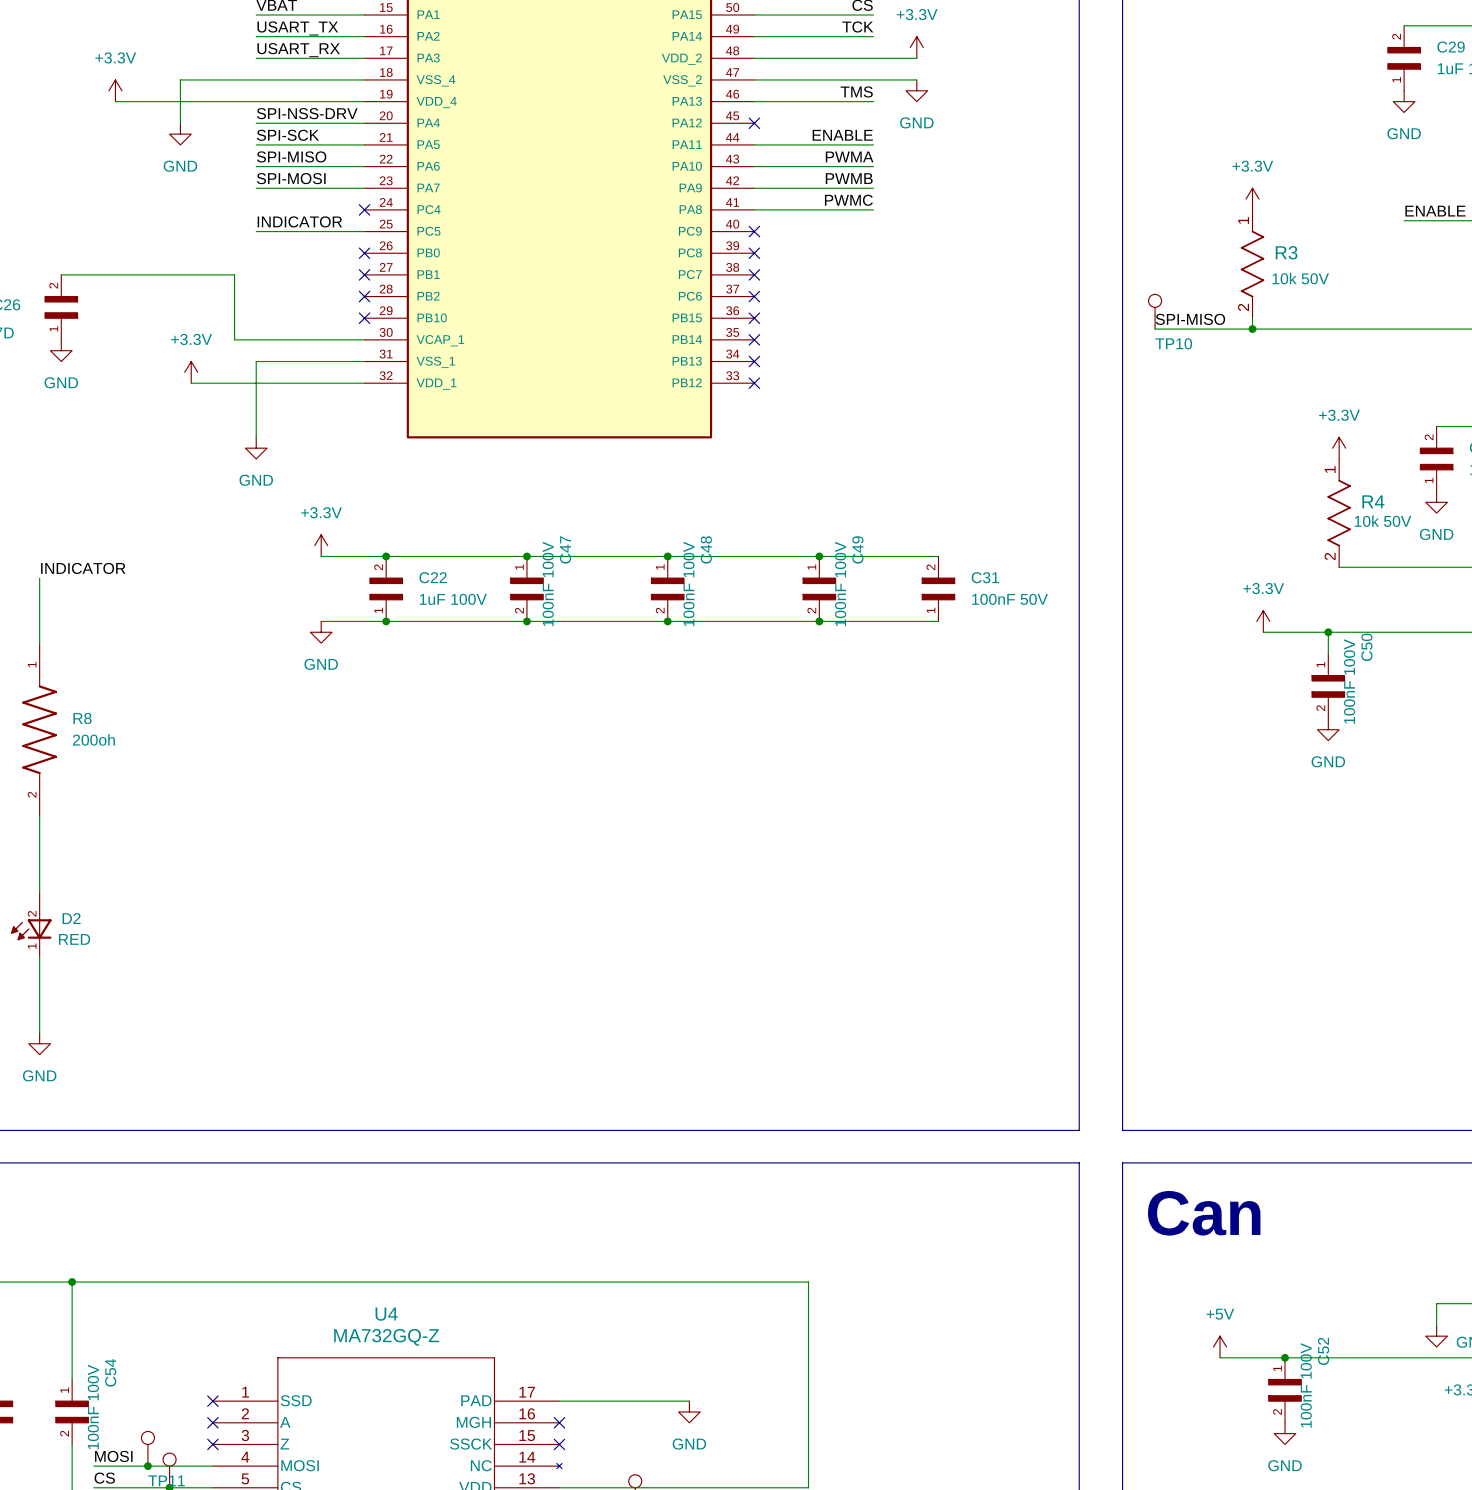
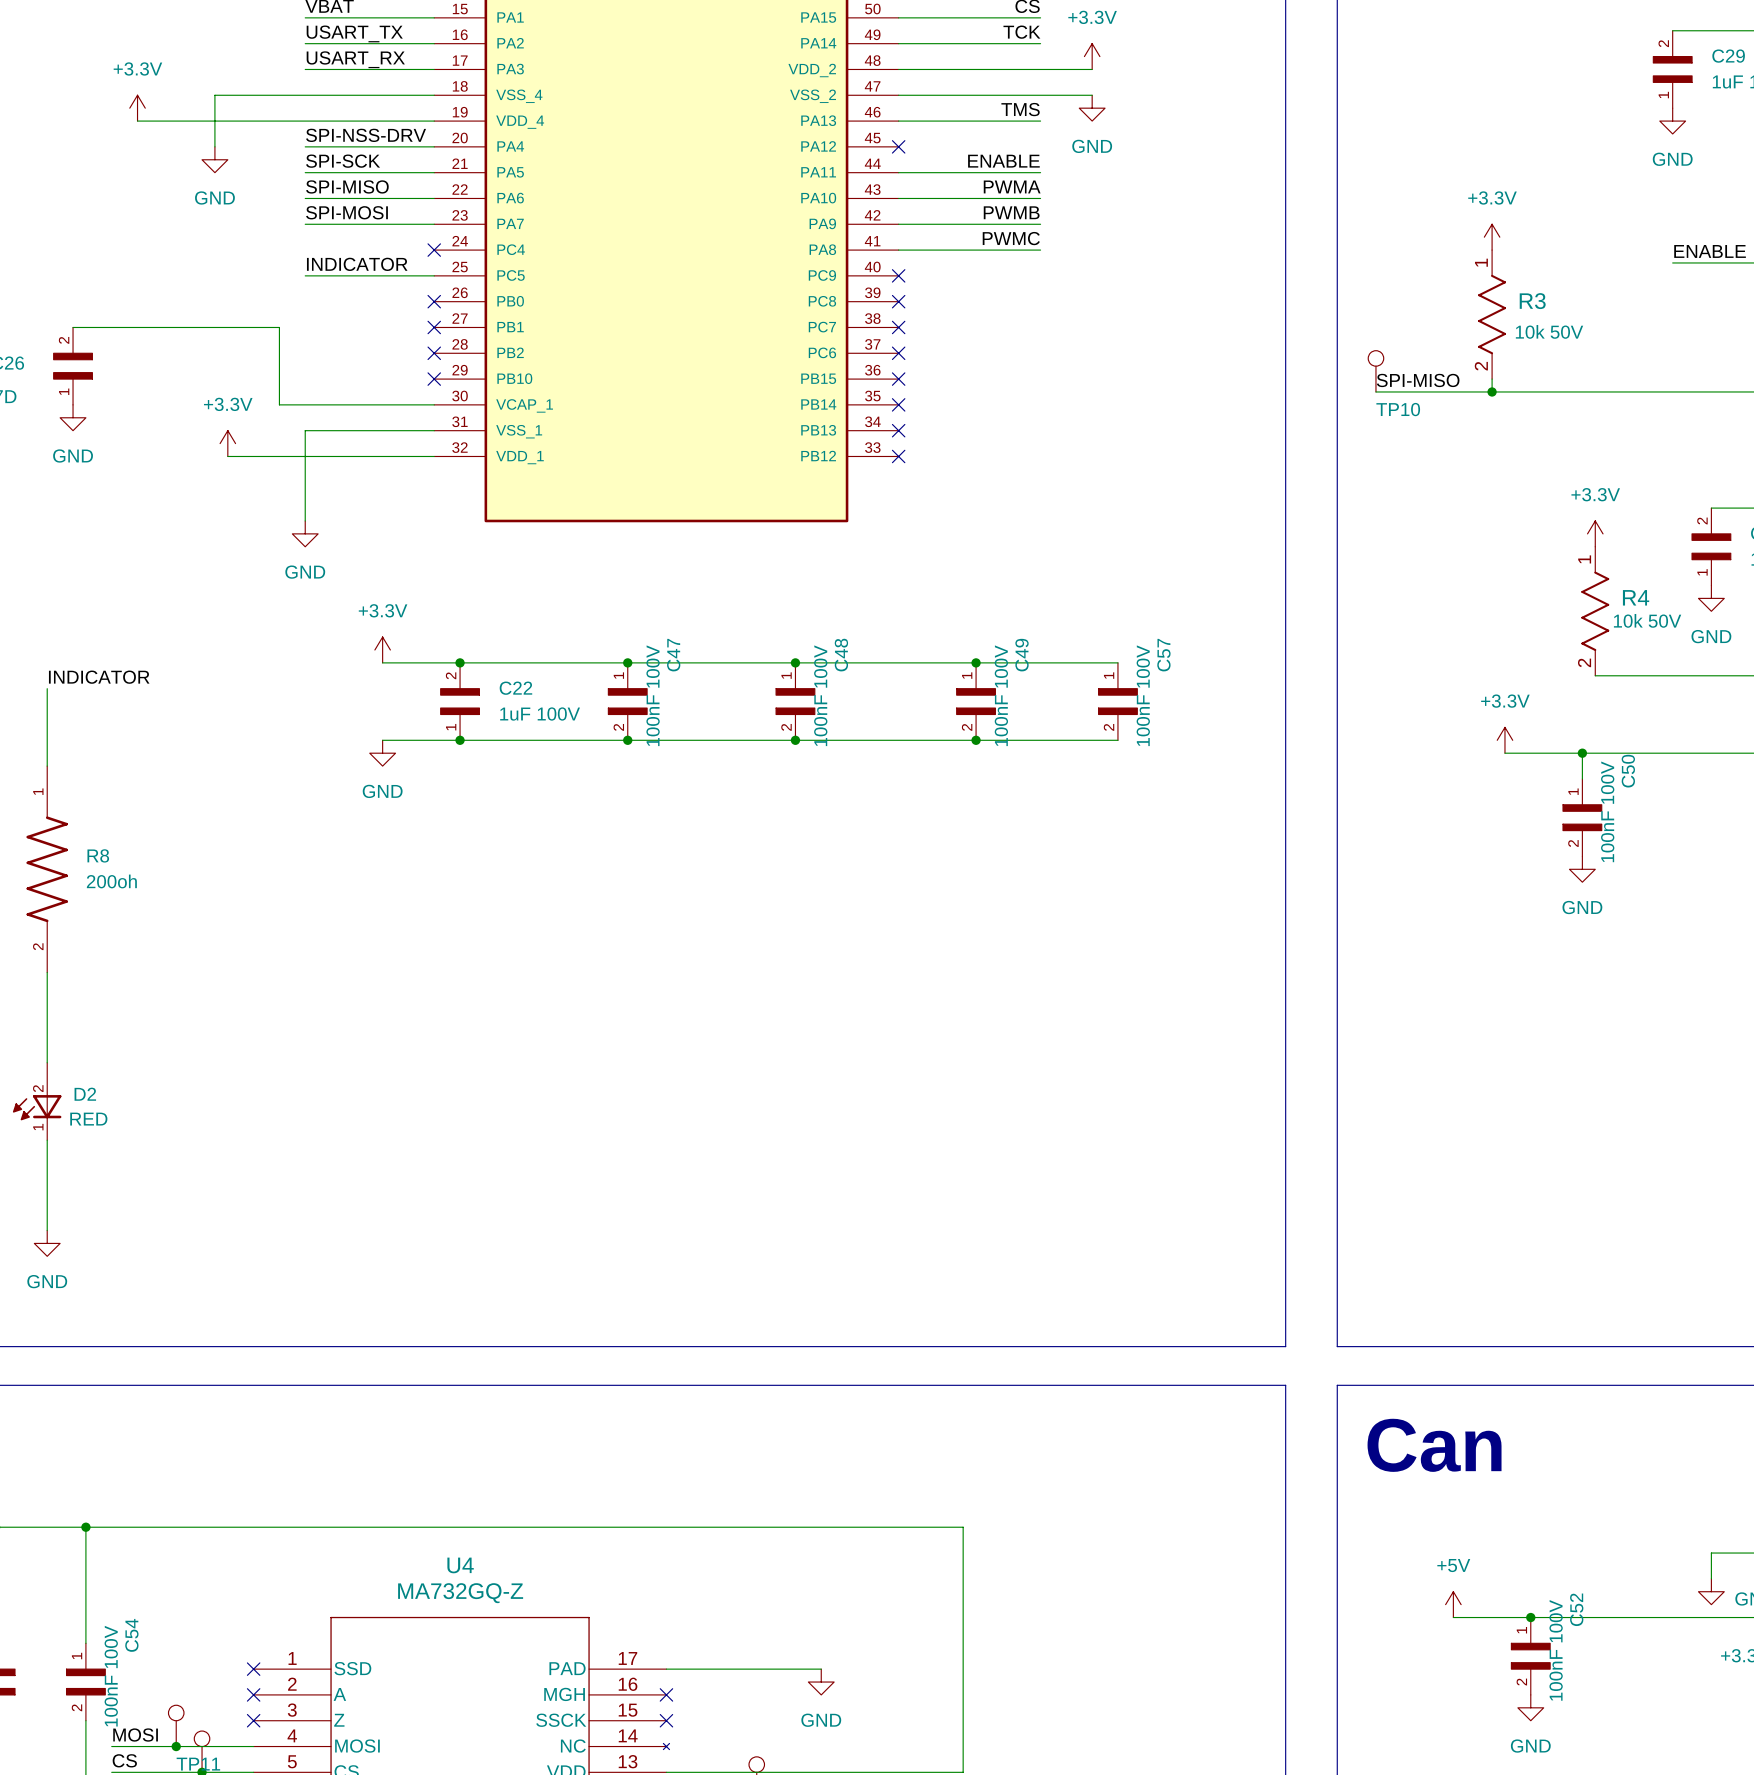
C31 name: C31 (985, 577) -> C57 (1163, 655)
C31 rotation: 0° (938, 588) -> 180° (1117, 701)
C31 value: 100nF 50V (1010, 599) -> 100nF 100V (1143, 695)

